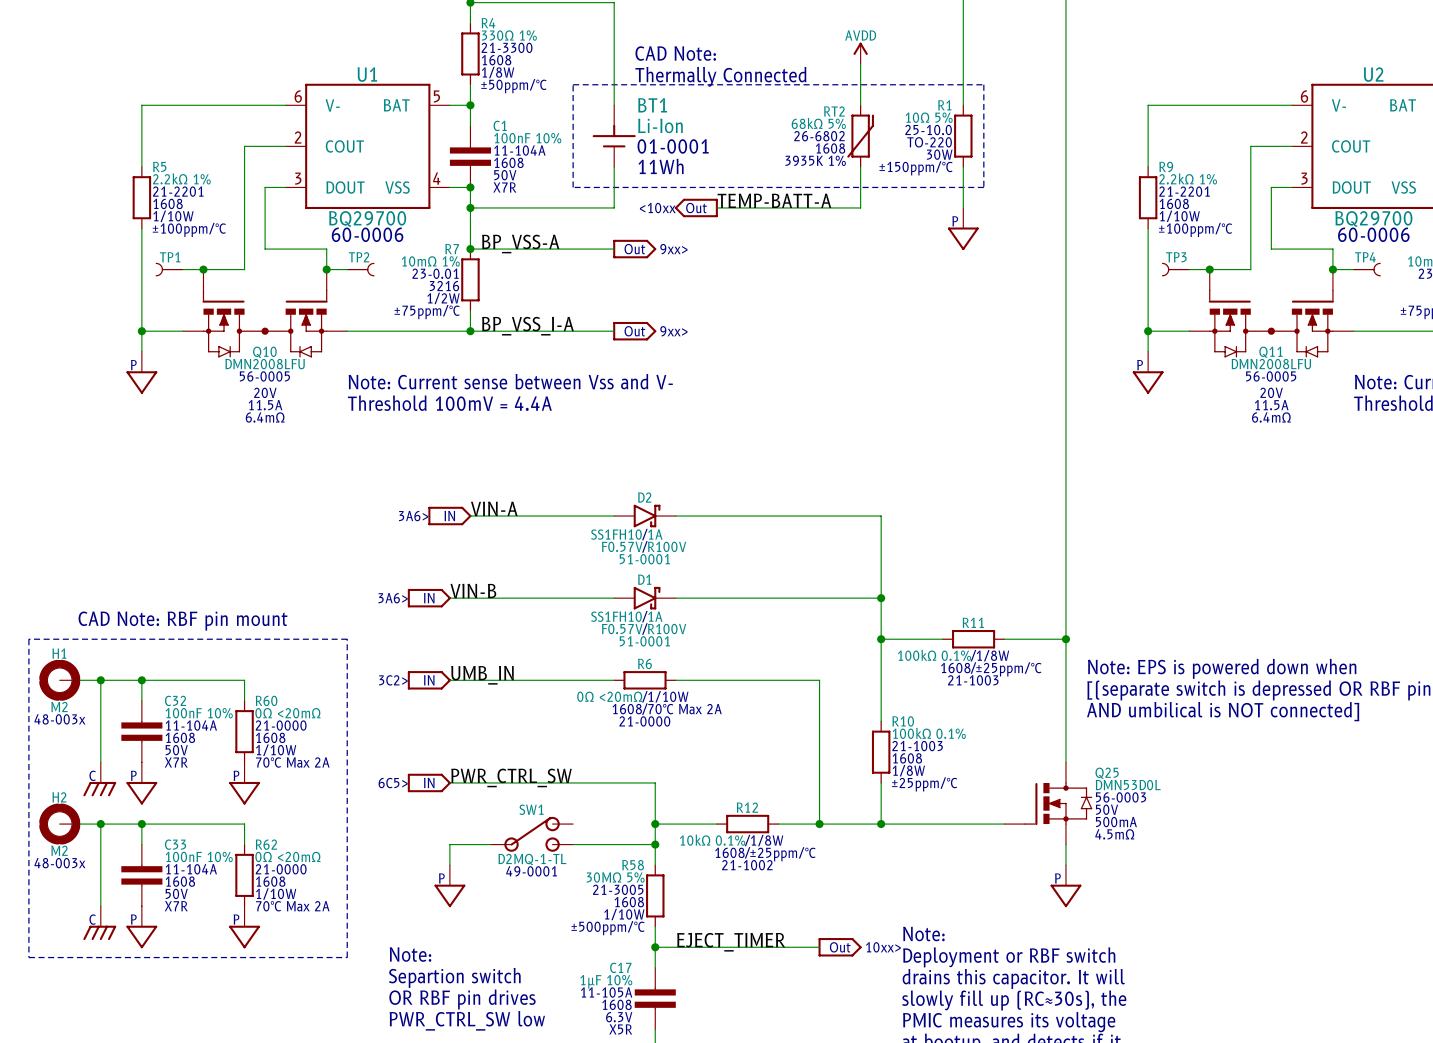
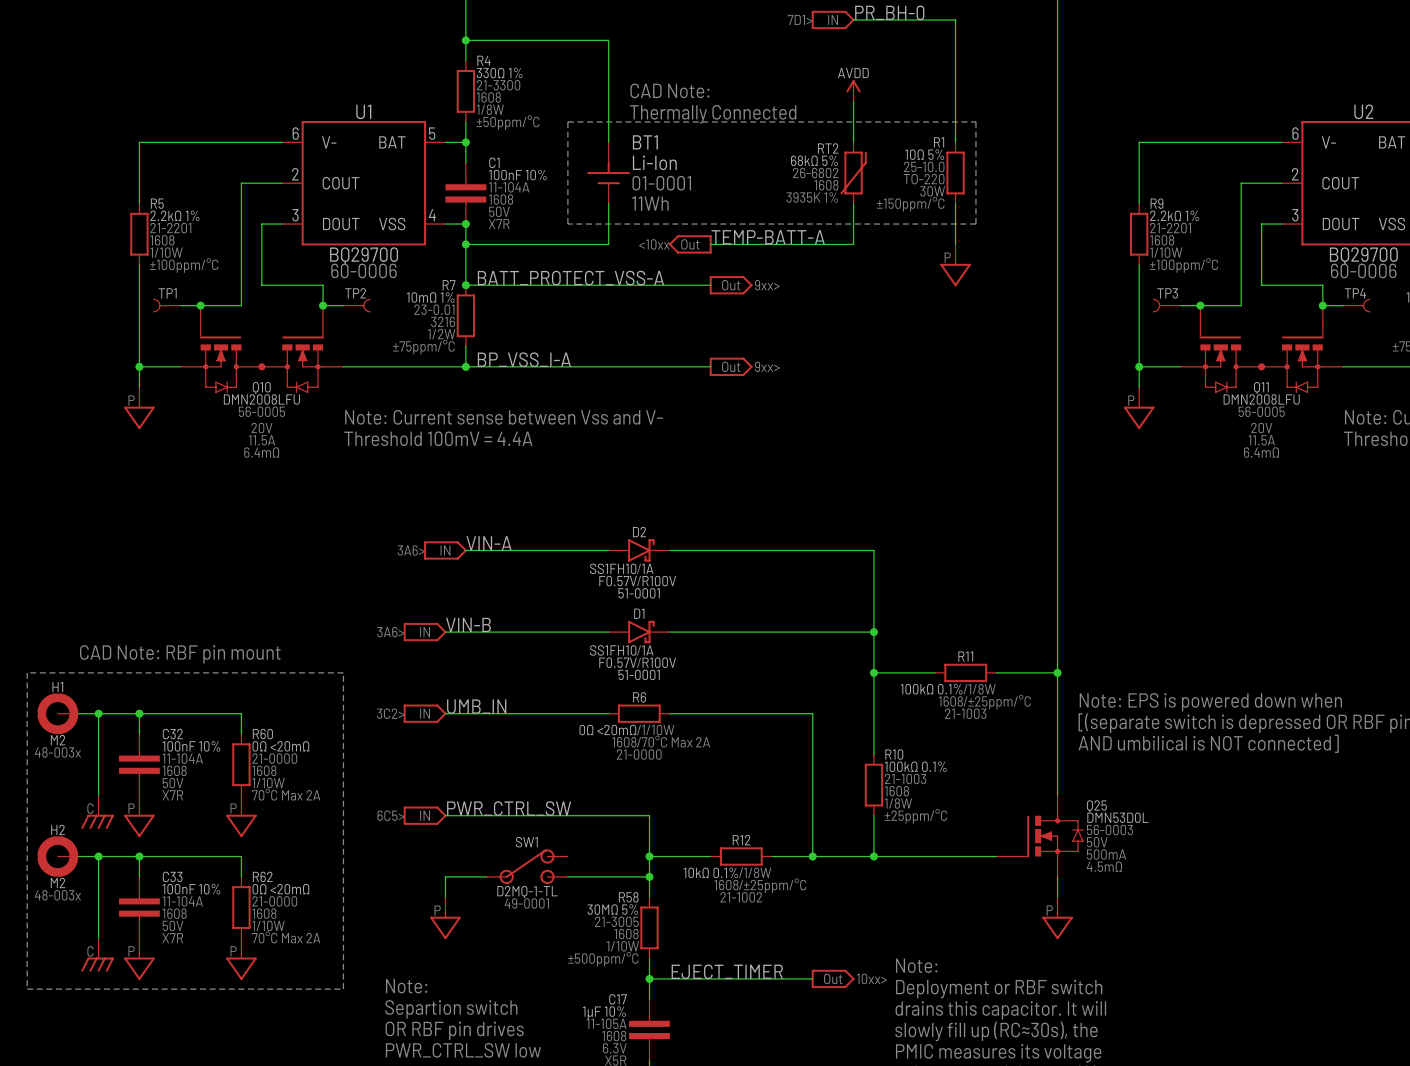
label: BP_VSS-A (520, 244) -> BATT_PROTECT_VSS-A (570, 278)
wire: none -> (608, 285) (710, 285)
part: (634, 249) -> none
text: 9xx> (673, 249) -> none
part: none -> (731, 285)
text: none -> 9xx> (767, 285)
wire: none -> (608, 366) (710, 366)
part: (634, 331) -> none
text: 9xx> (673, 331) -> none
part: none -> (731, 366)
text: none -> 9xx> (767, 366)

